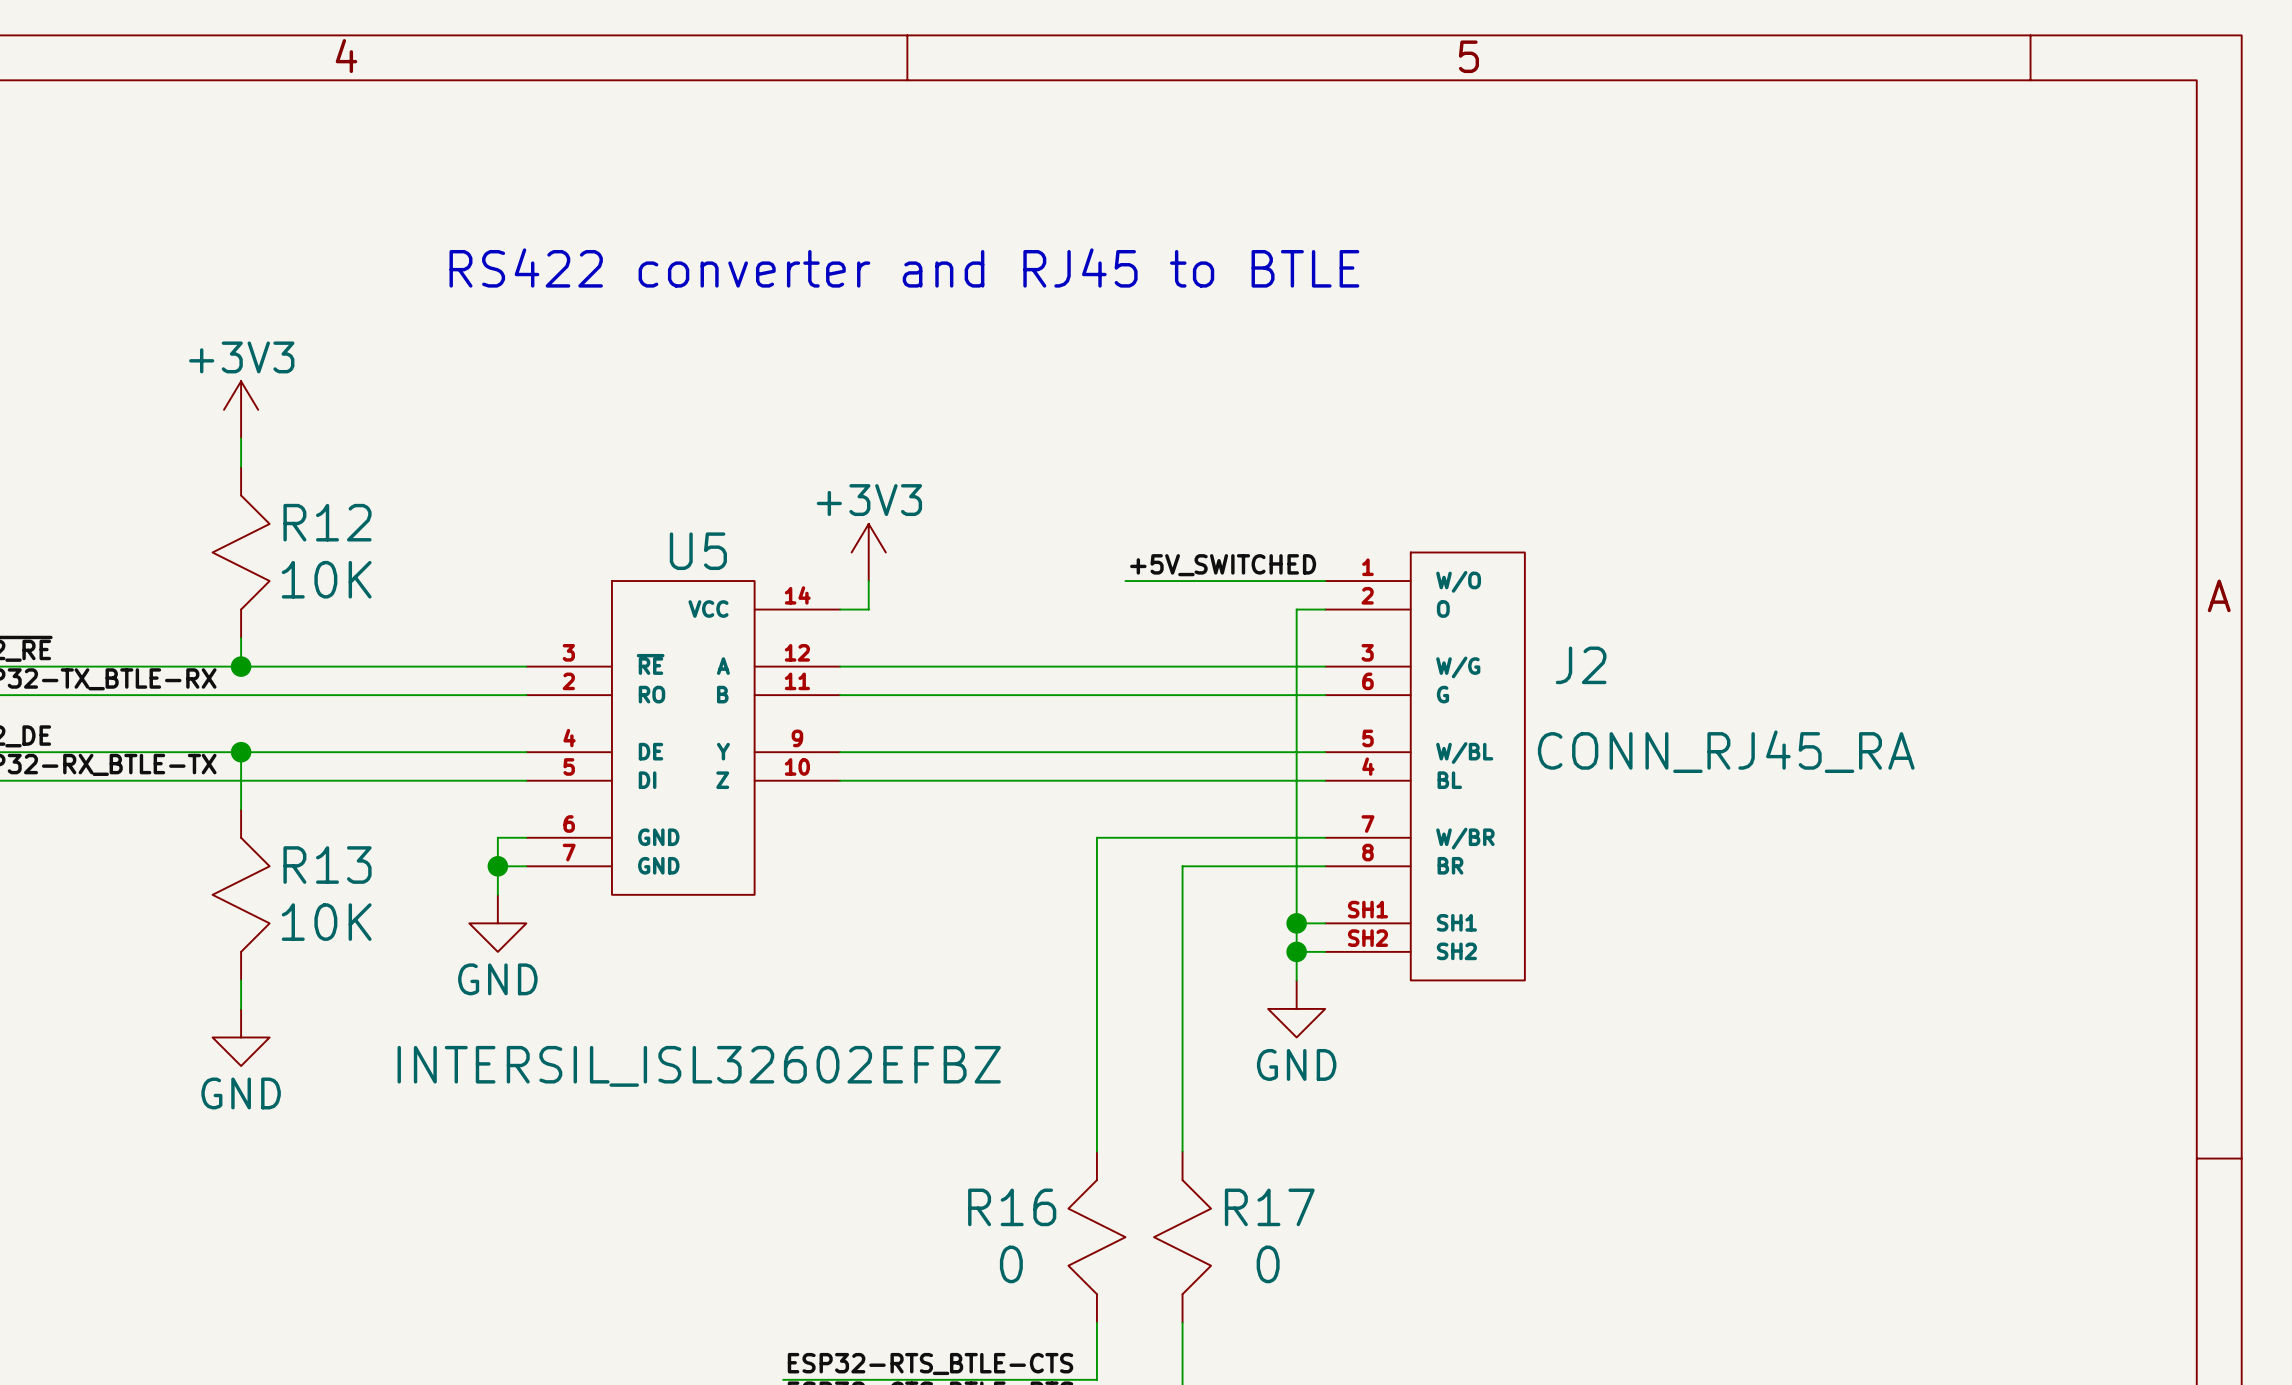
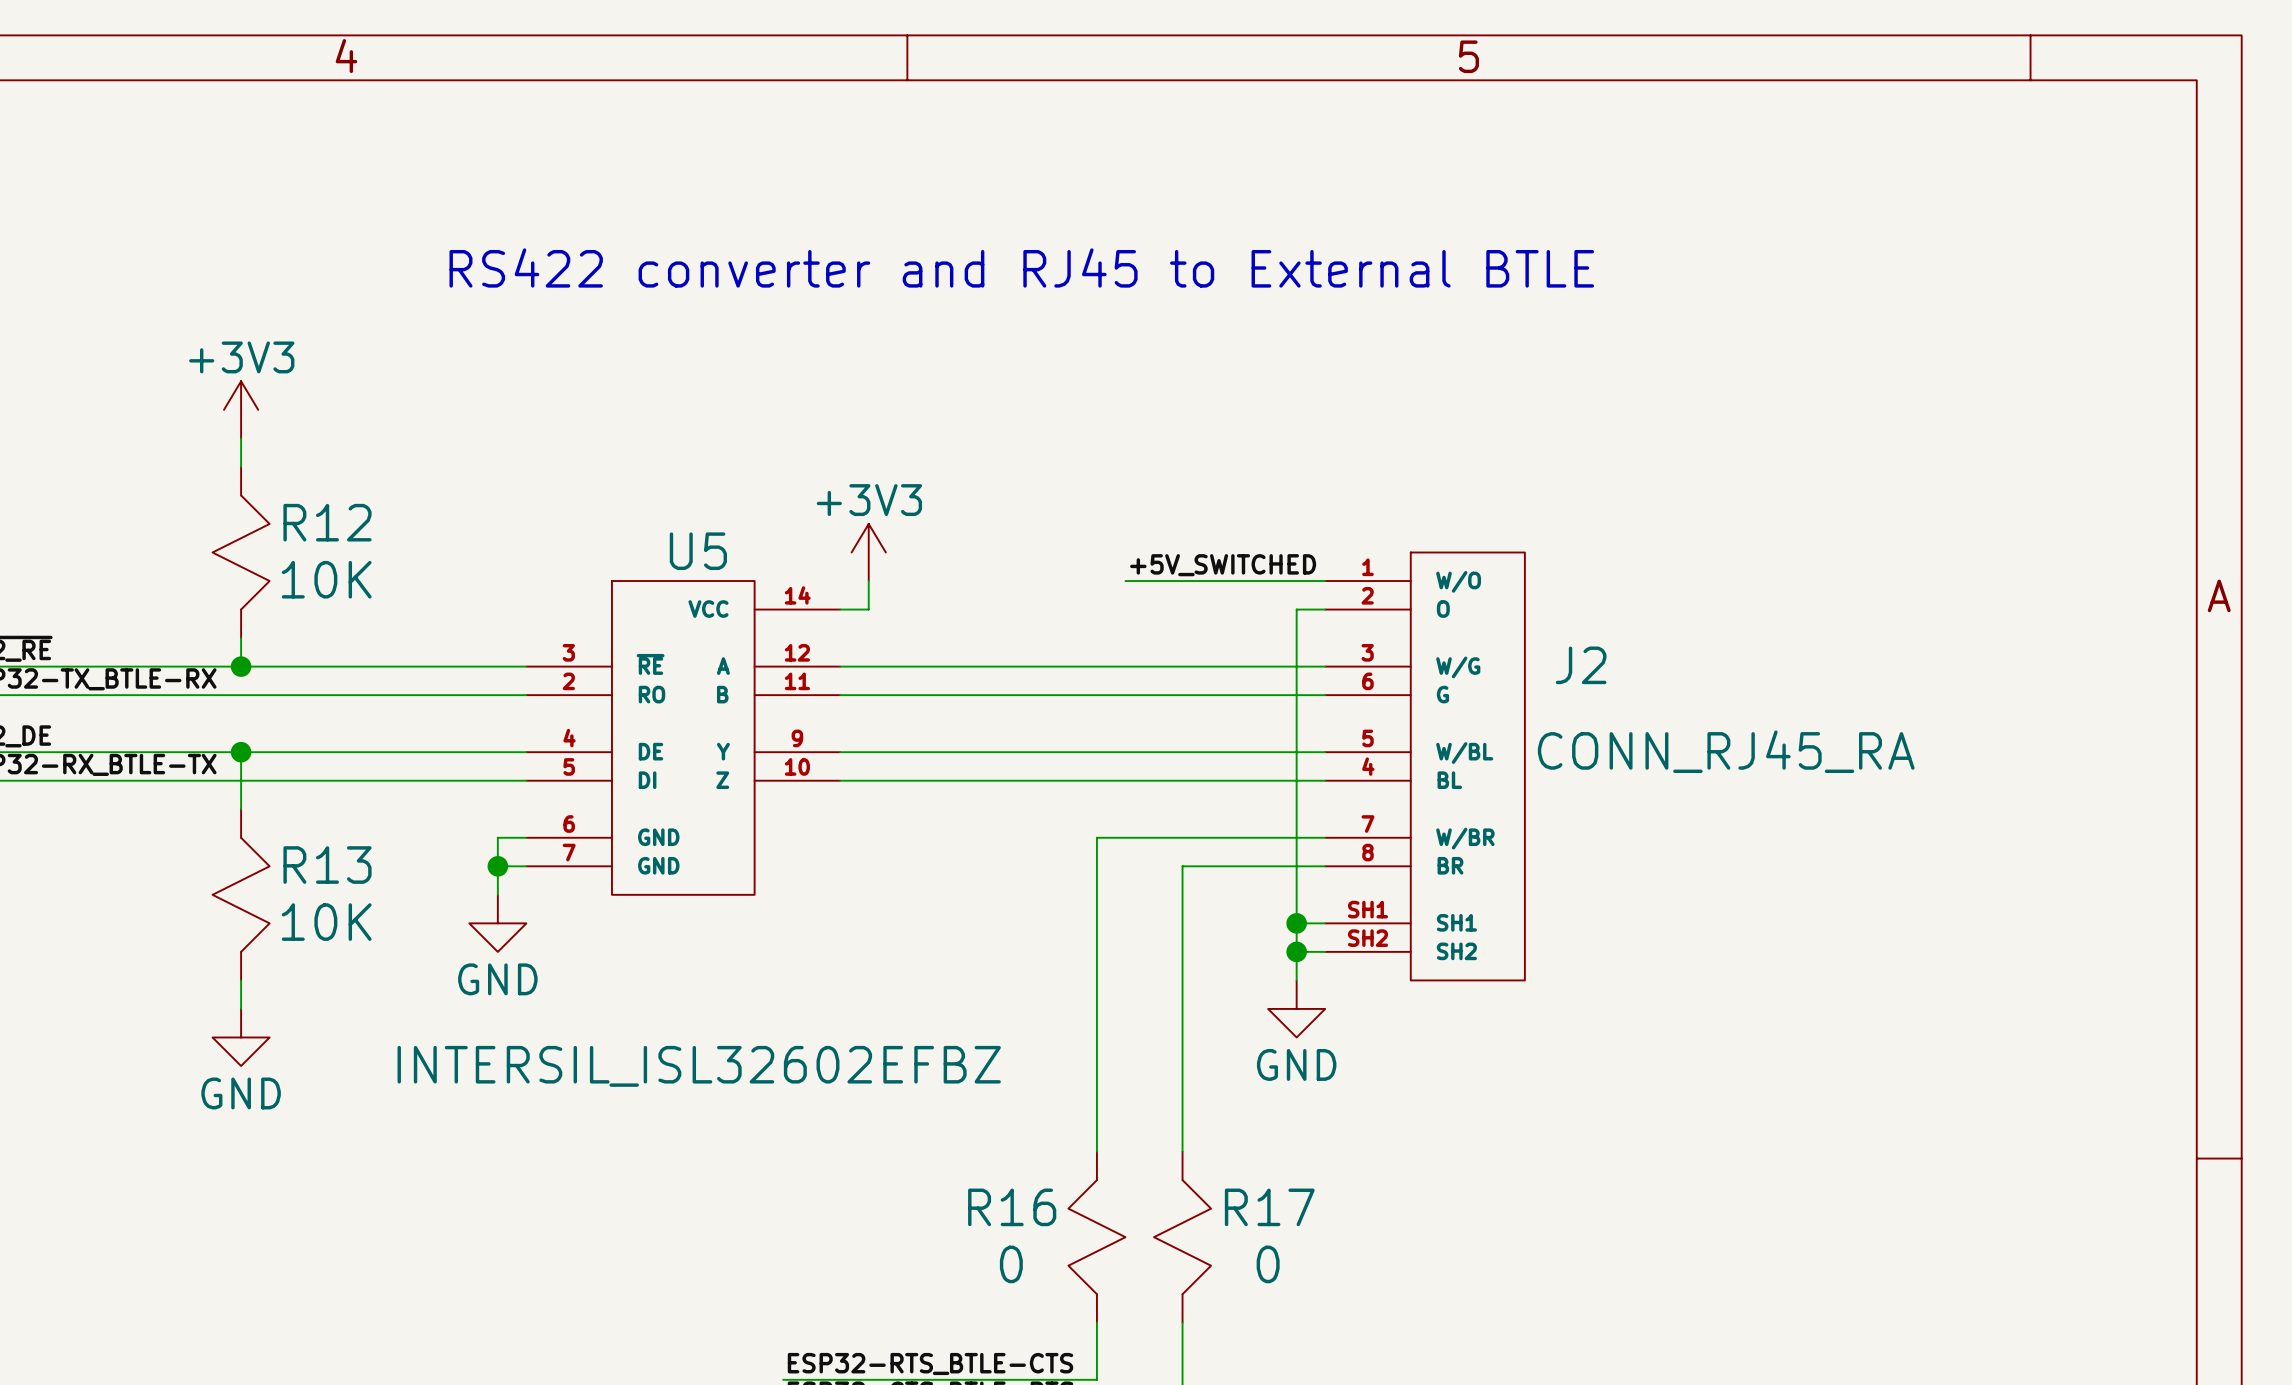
text: RS422 converter and RJ45 to BTLE (904, 267) -> RS422 converter and RJ45 to External BTLE (1021, 267)

